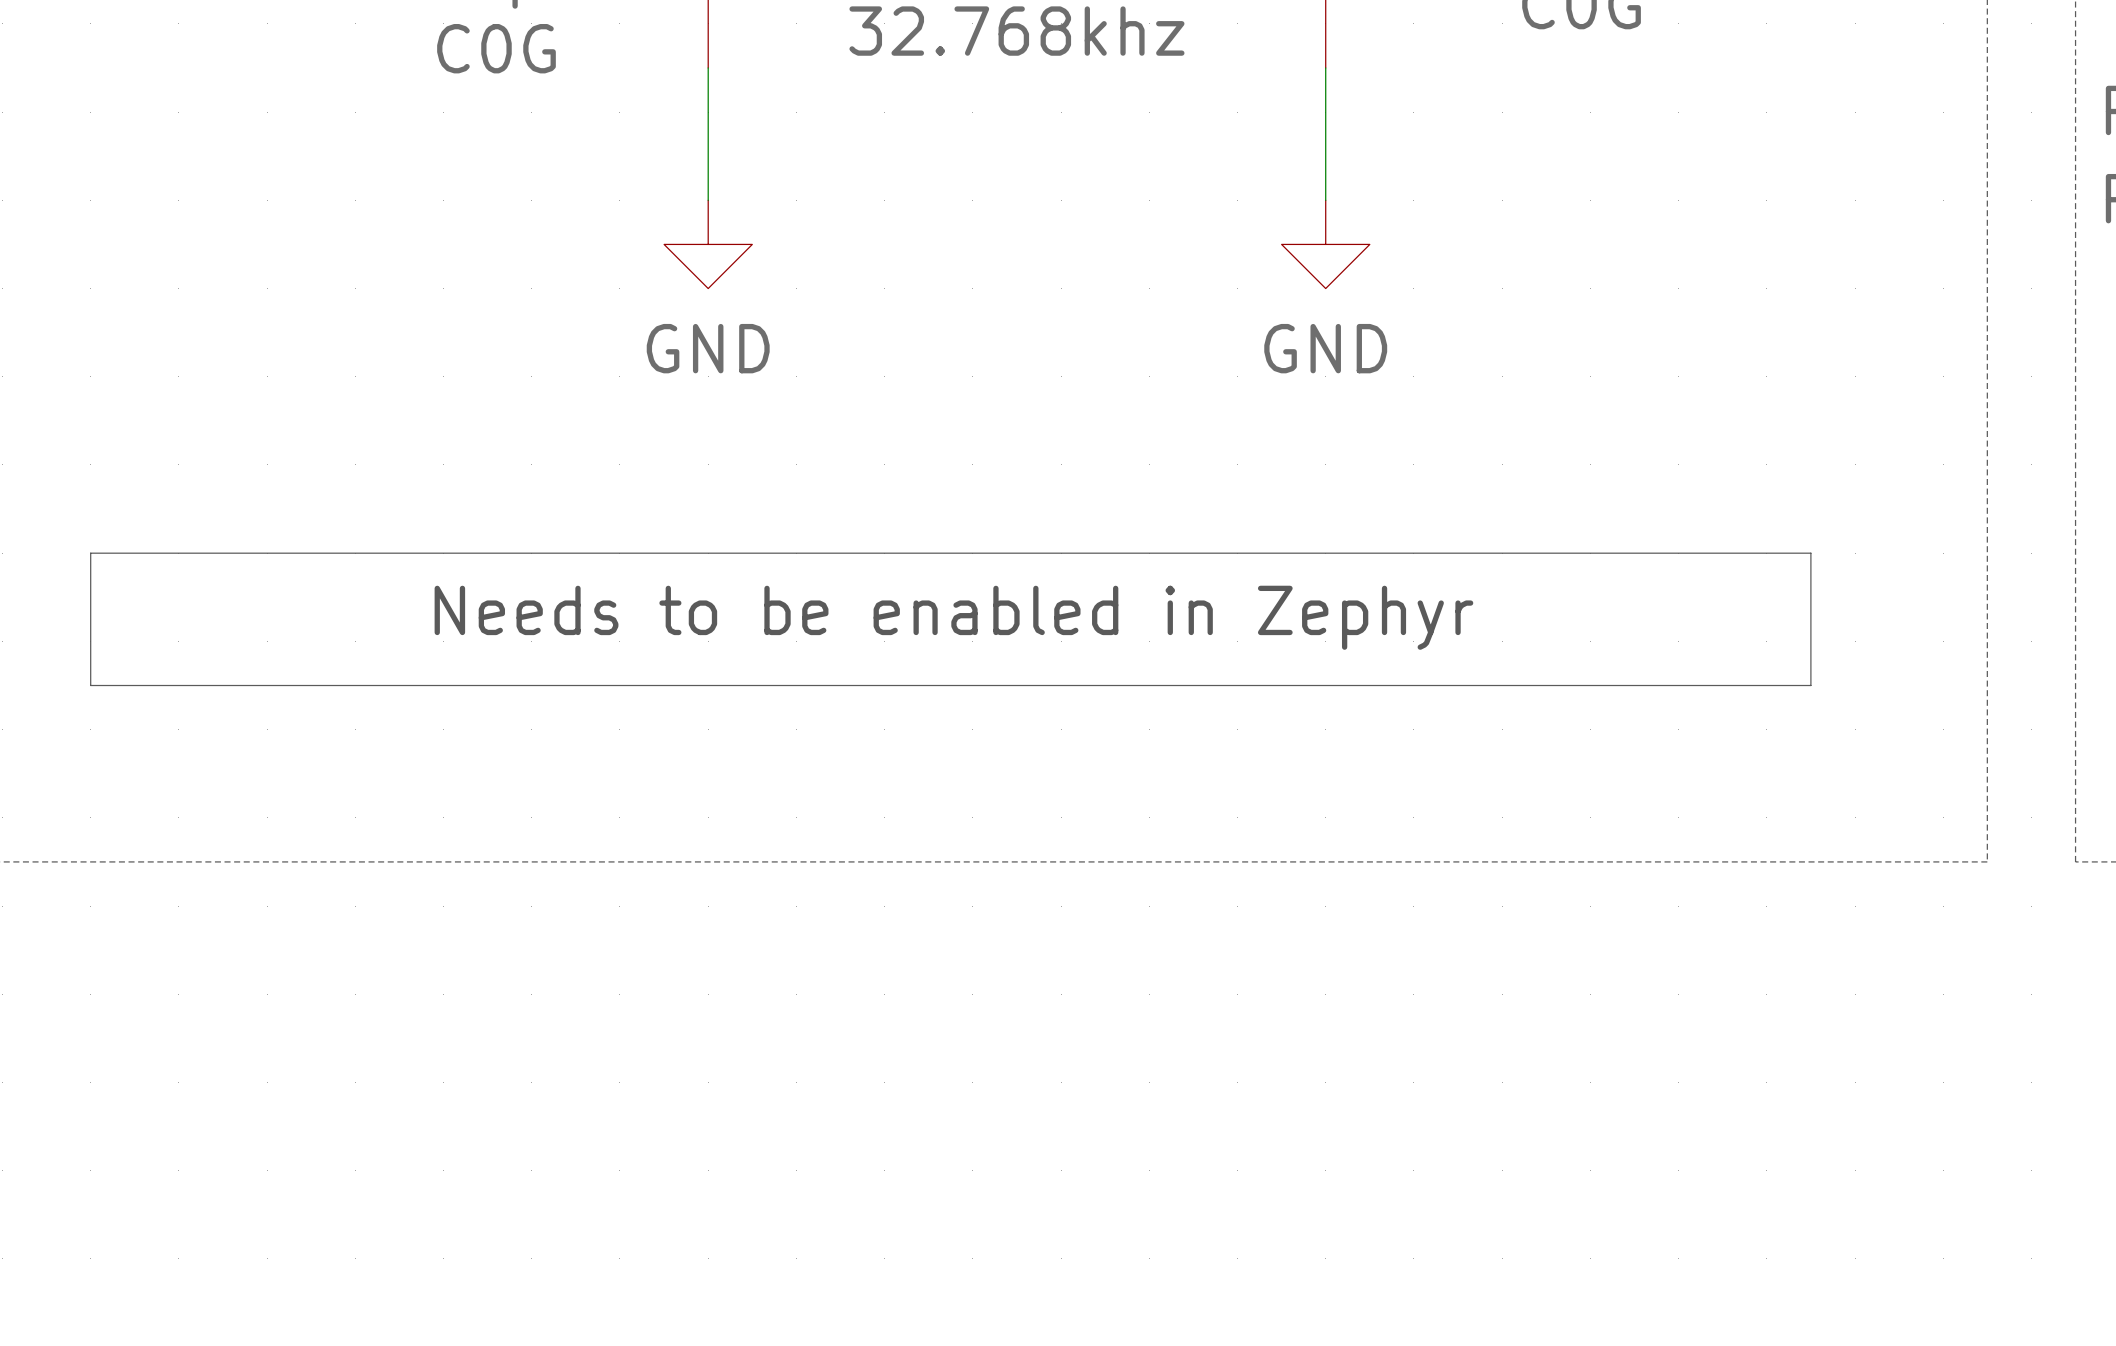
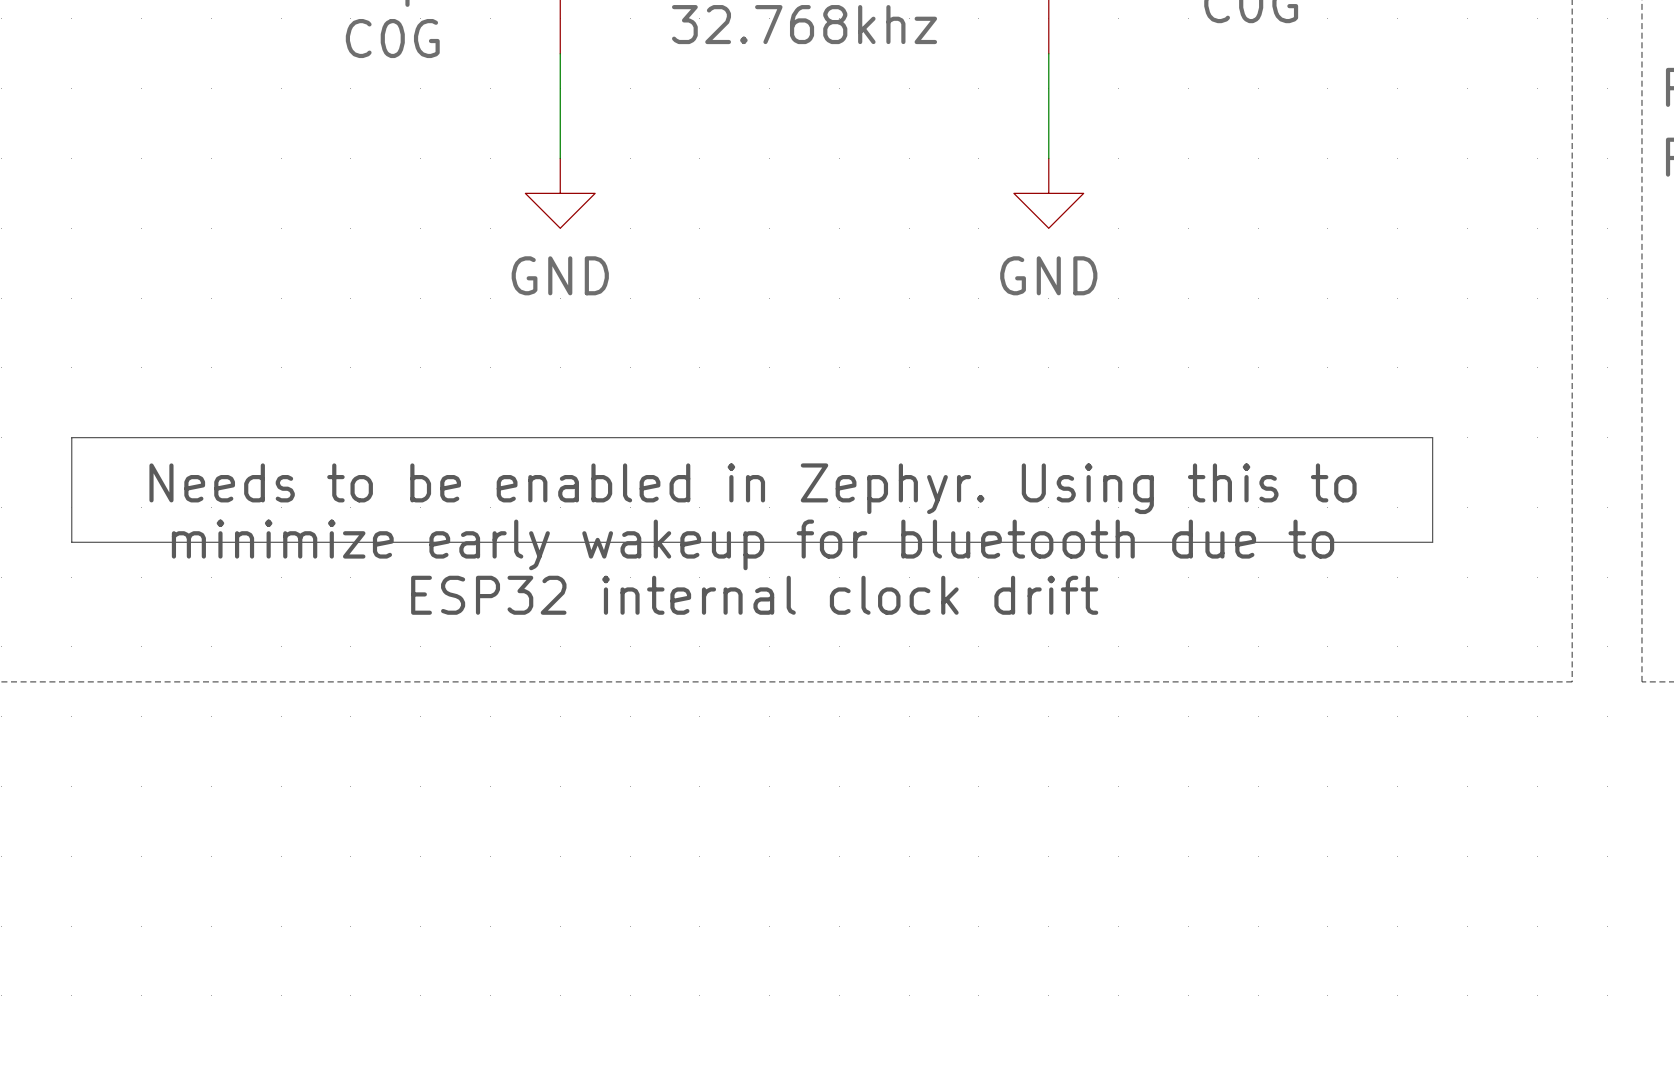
text: Needs to be enabled in Zephyr (953, 617) -> Needs to be enabled in Zephyr. Using this to (753, 488)
text: none -> minimize early wakeup for bluetooth due to (753, 544)
text: none -> ESP32 internal clock drift (754, 595)

